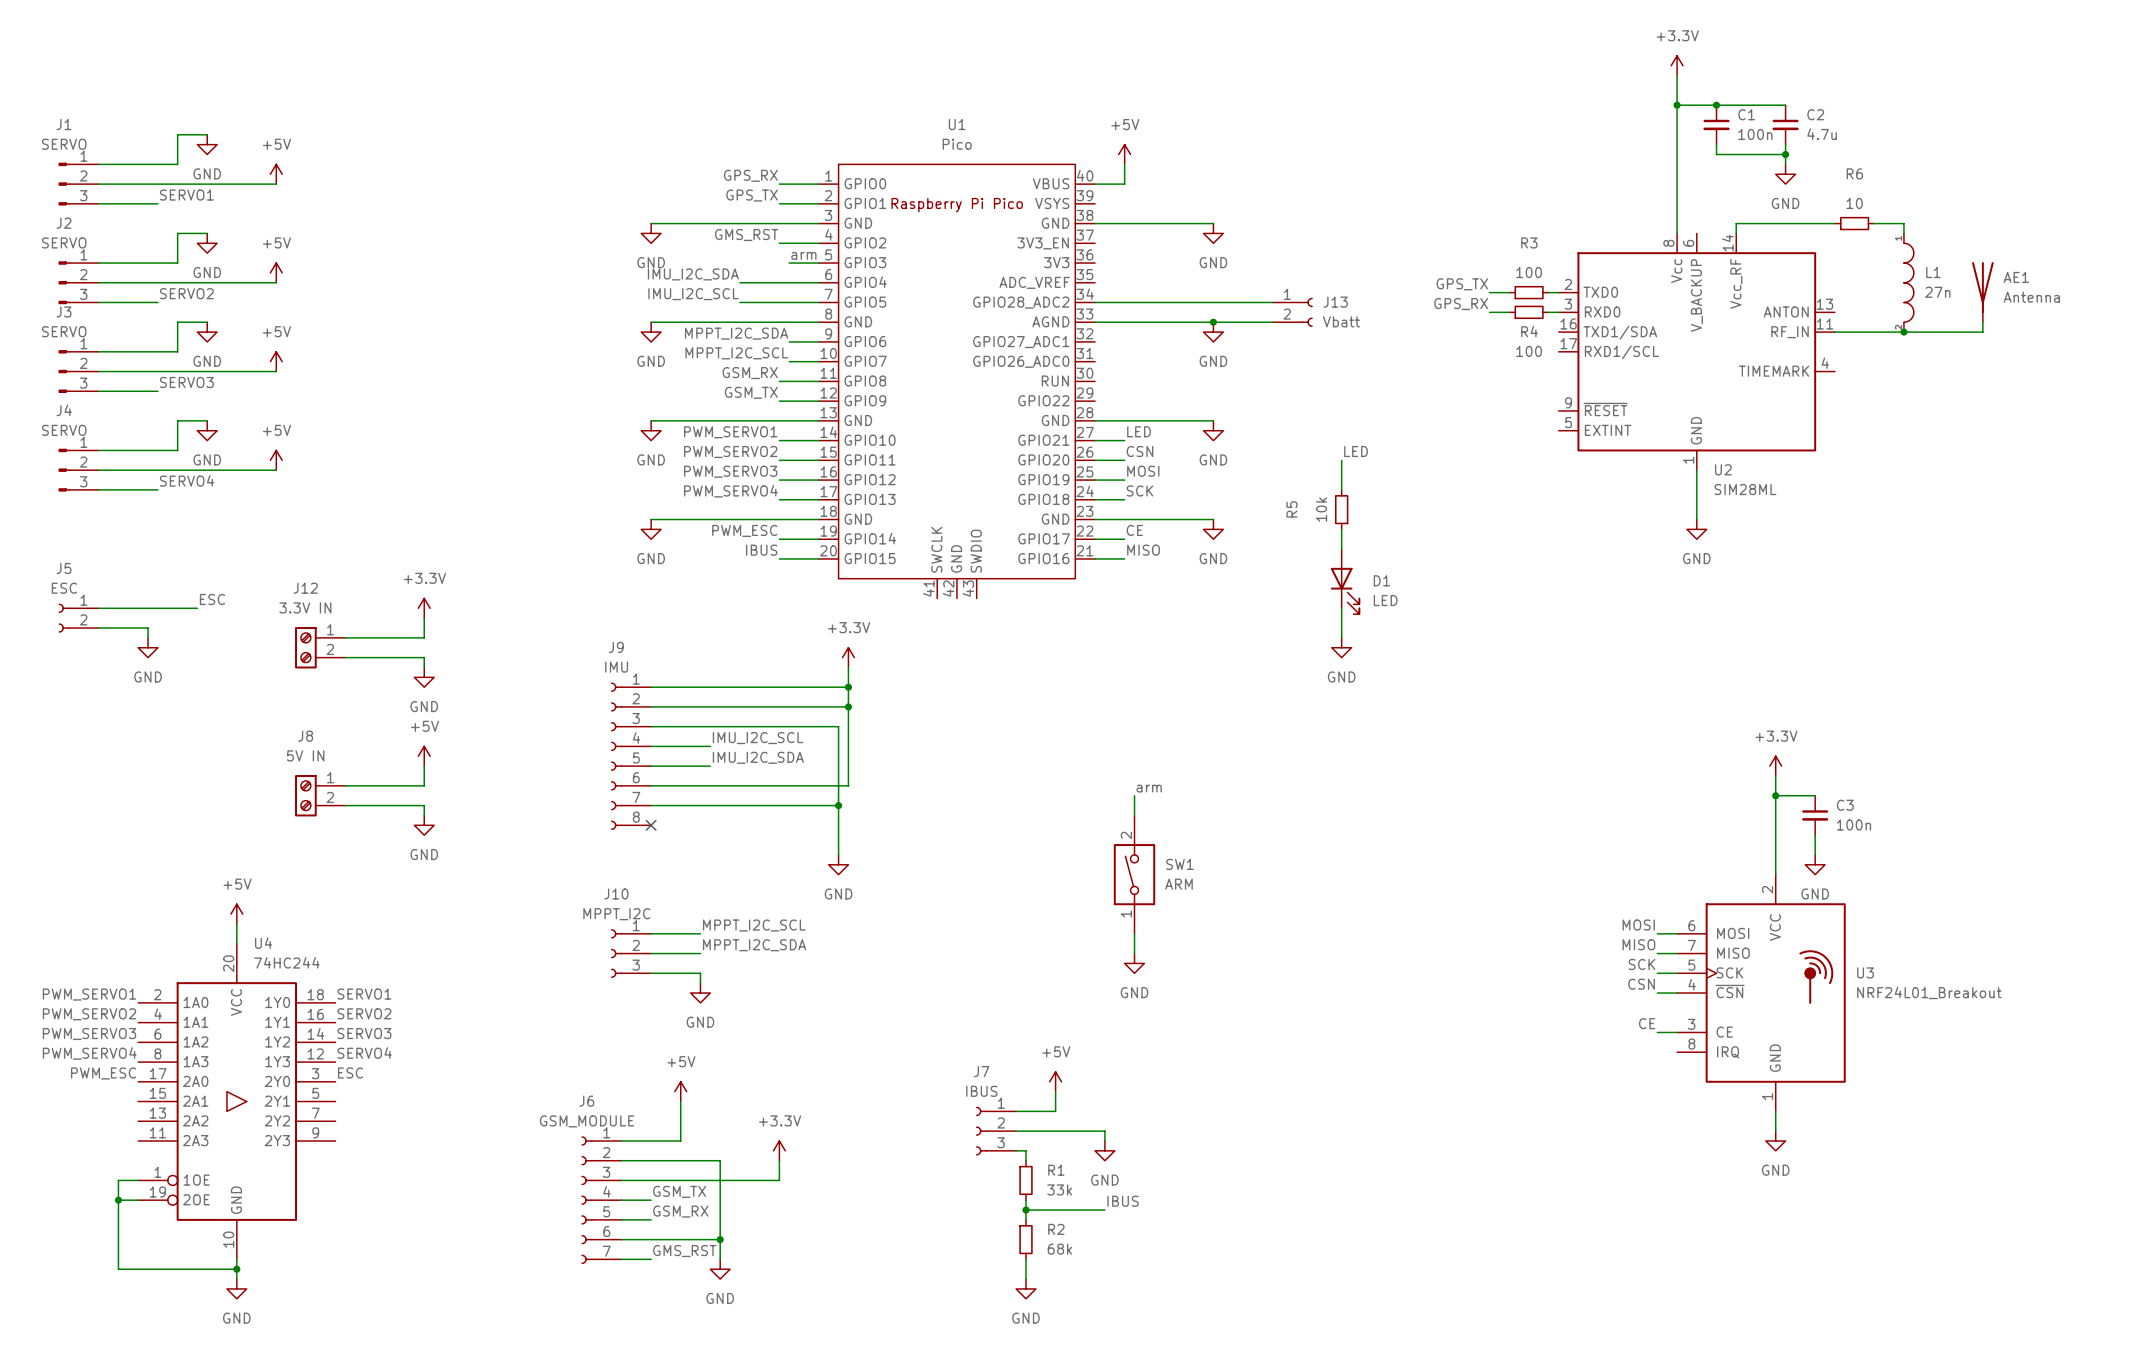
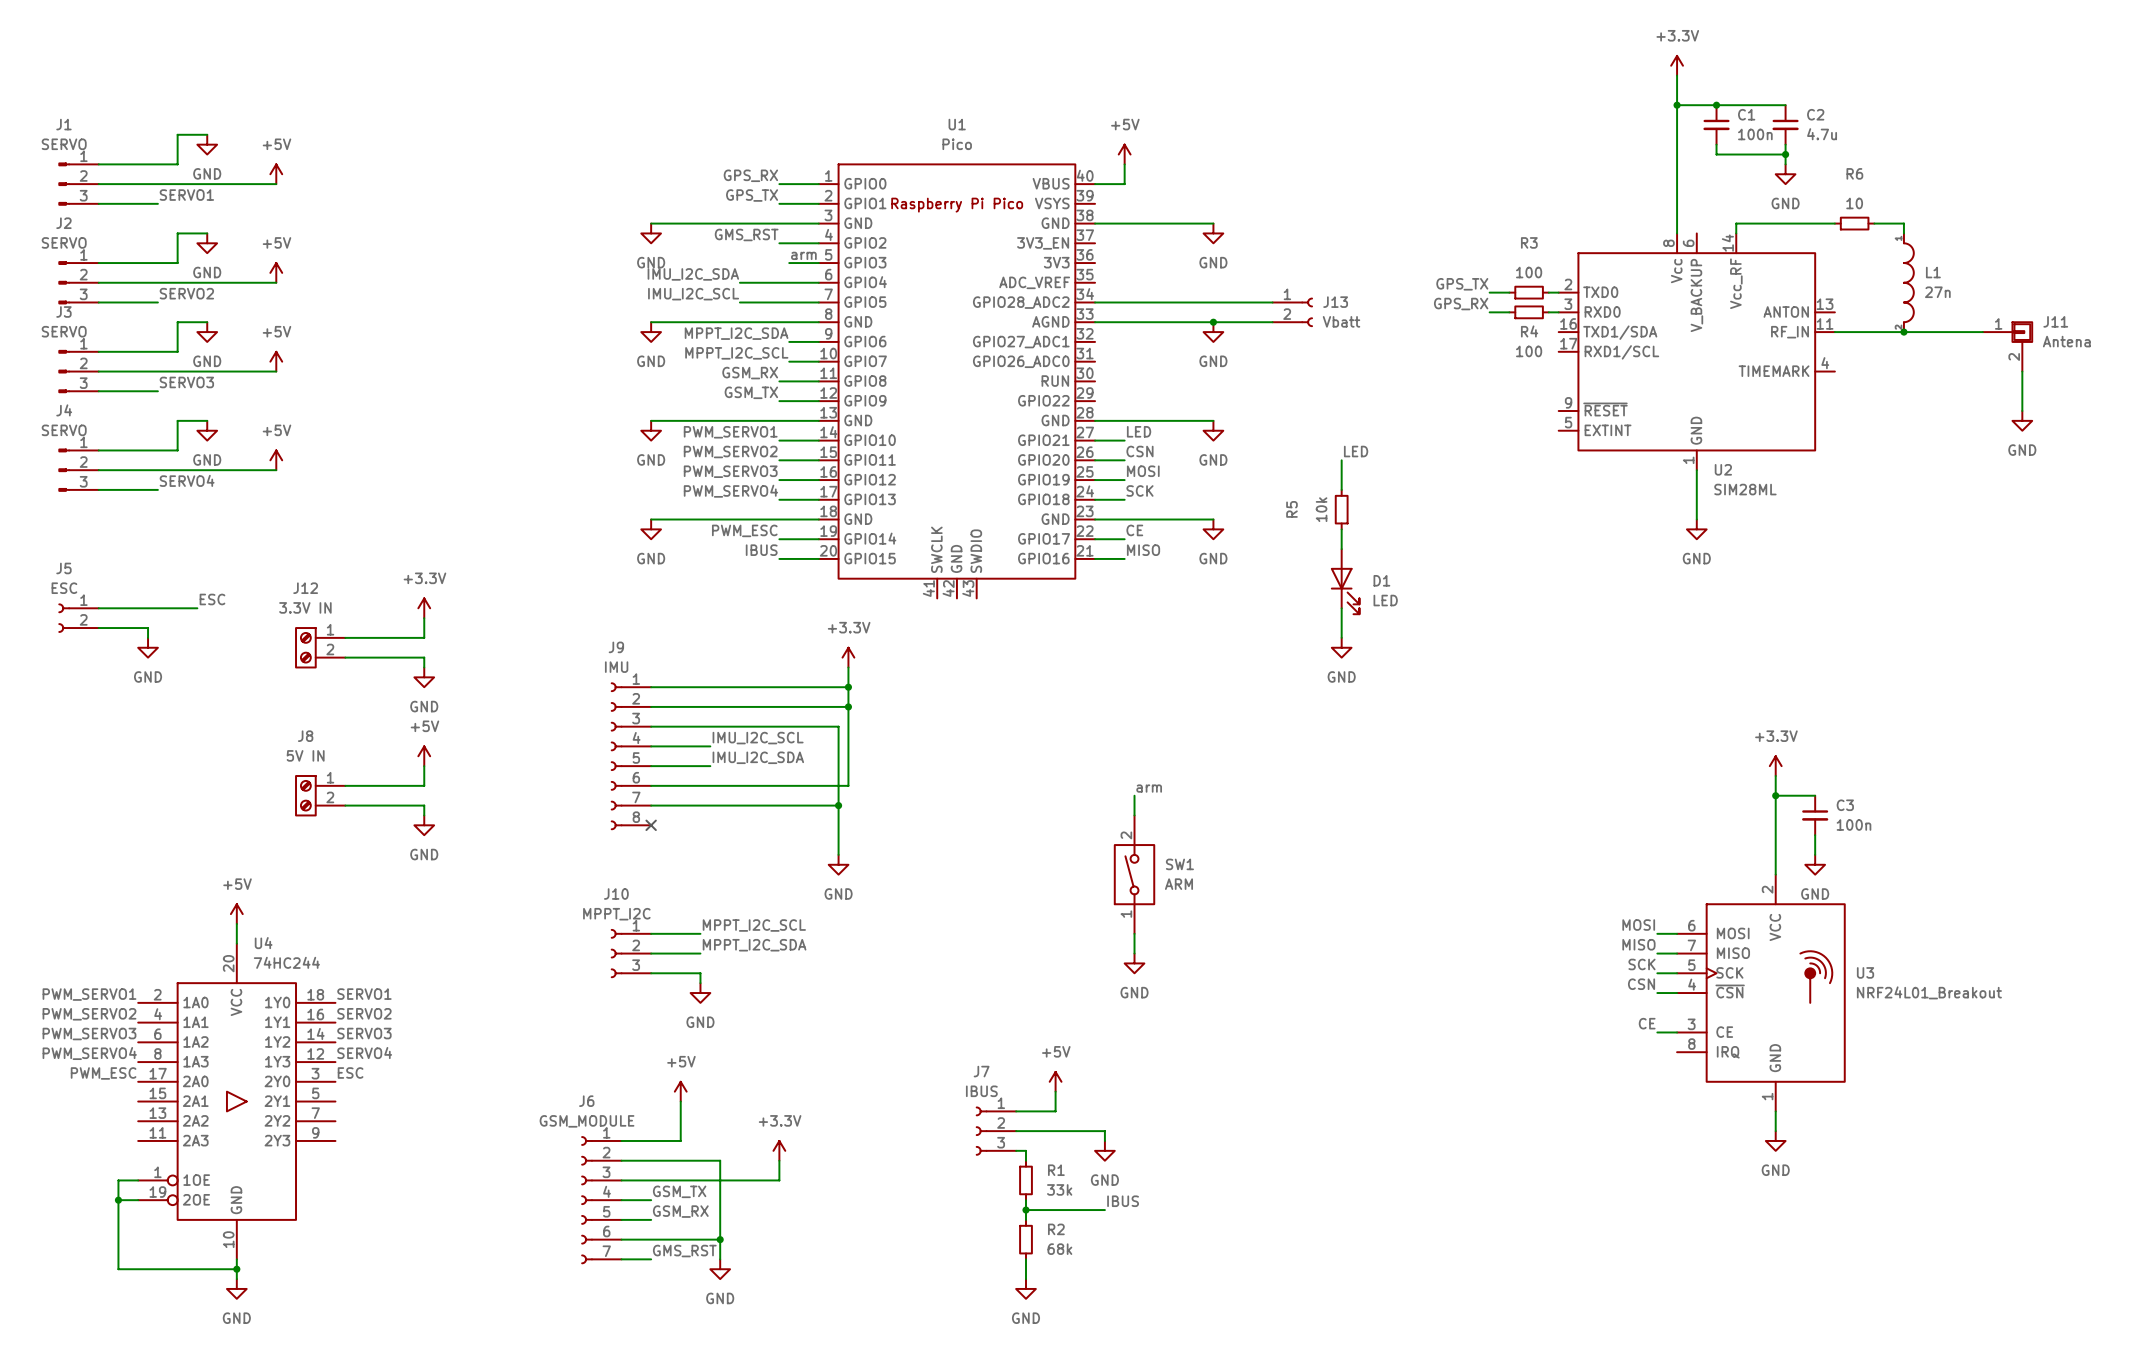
AE1: Antenna (1982, 292) -> none
wire: (1982, 322) (1982, 332) -> none
J11: none -> Antena (2007, 346)
wire: none -> (2022, 371) (2022, 411)
power symbol: none -> GND (2022, 420)

